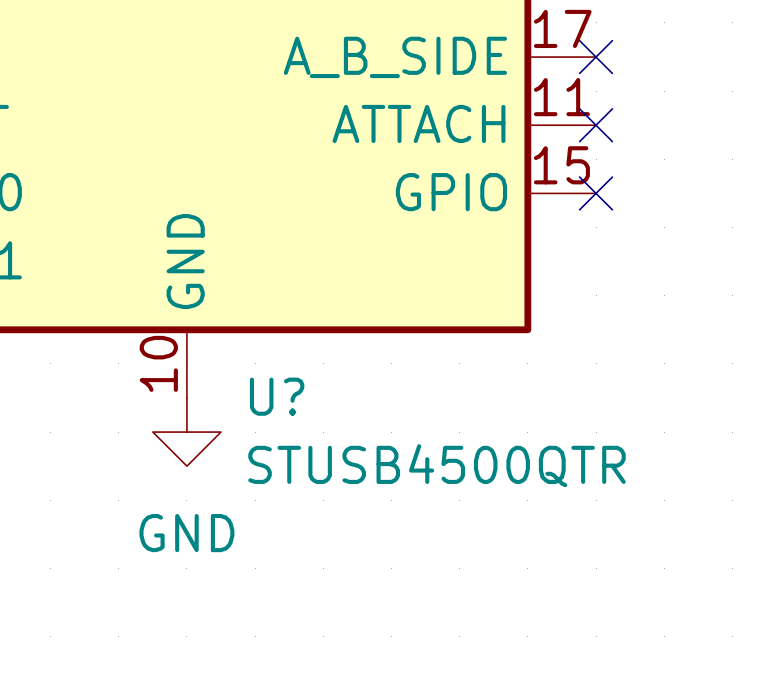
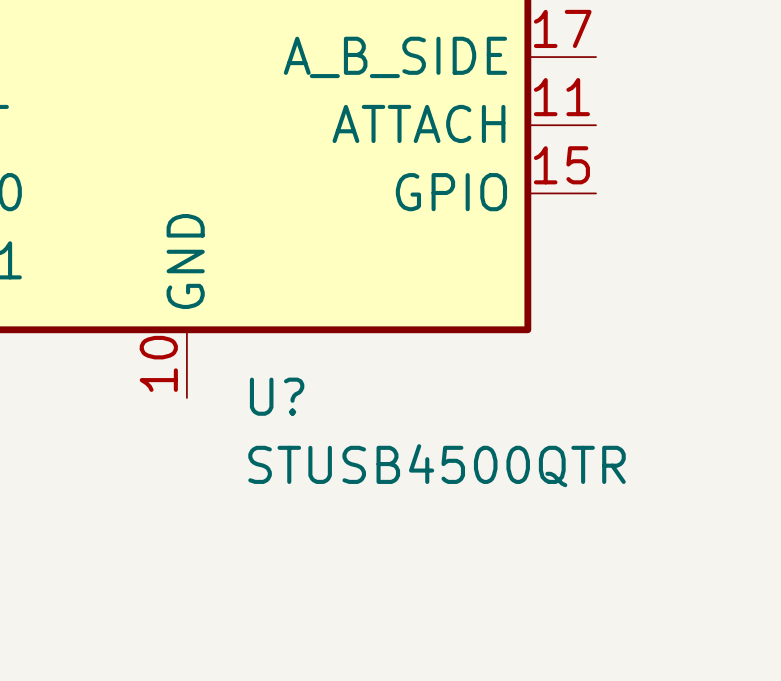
no-connect mark: (596, 57) -> none
no-connect mark: (596, 125) -> none
no-connect mark: (596, 193) -> none
power symbol: GND (186, 432) -> none

